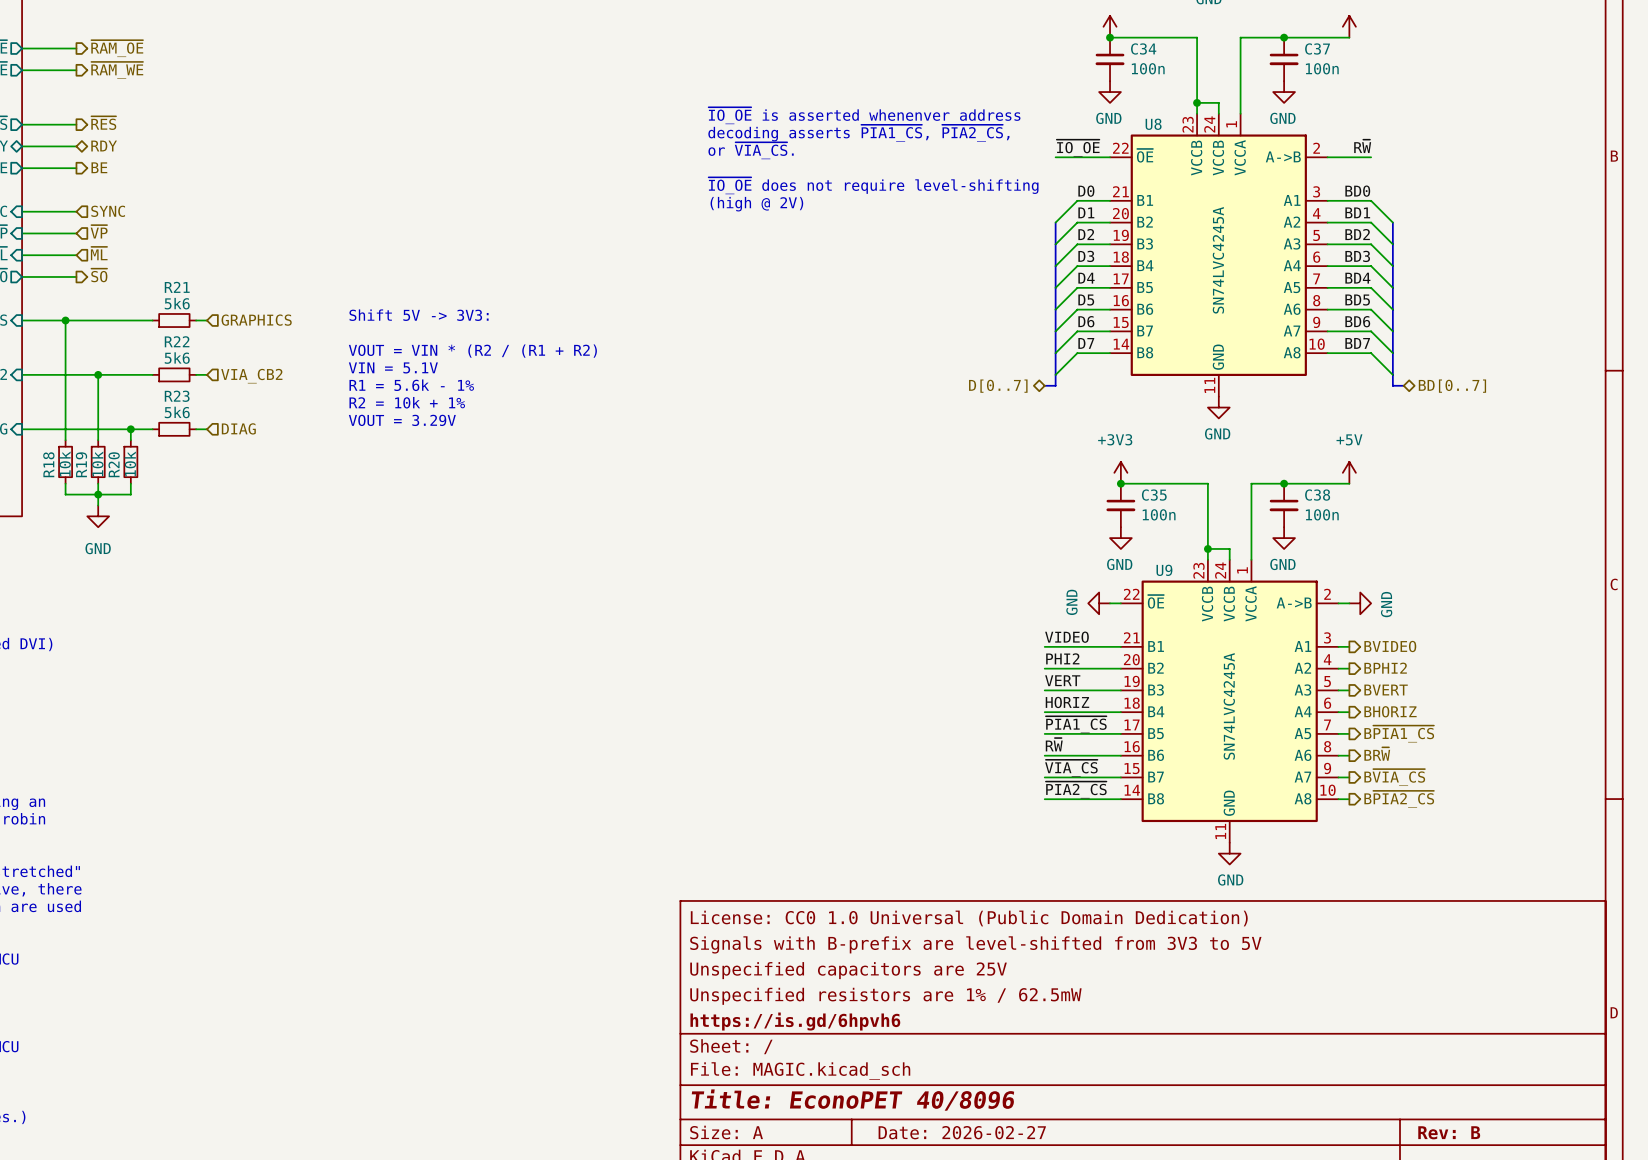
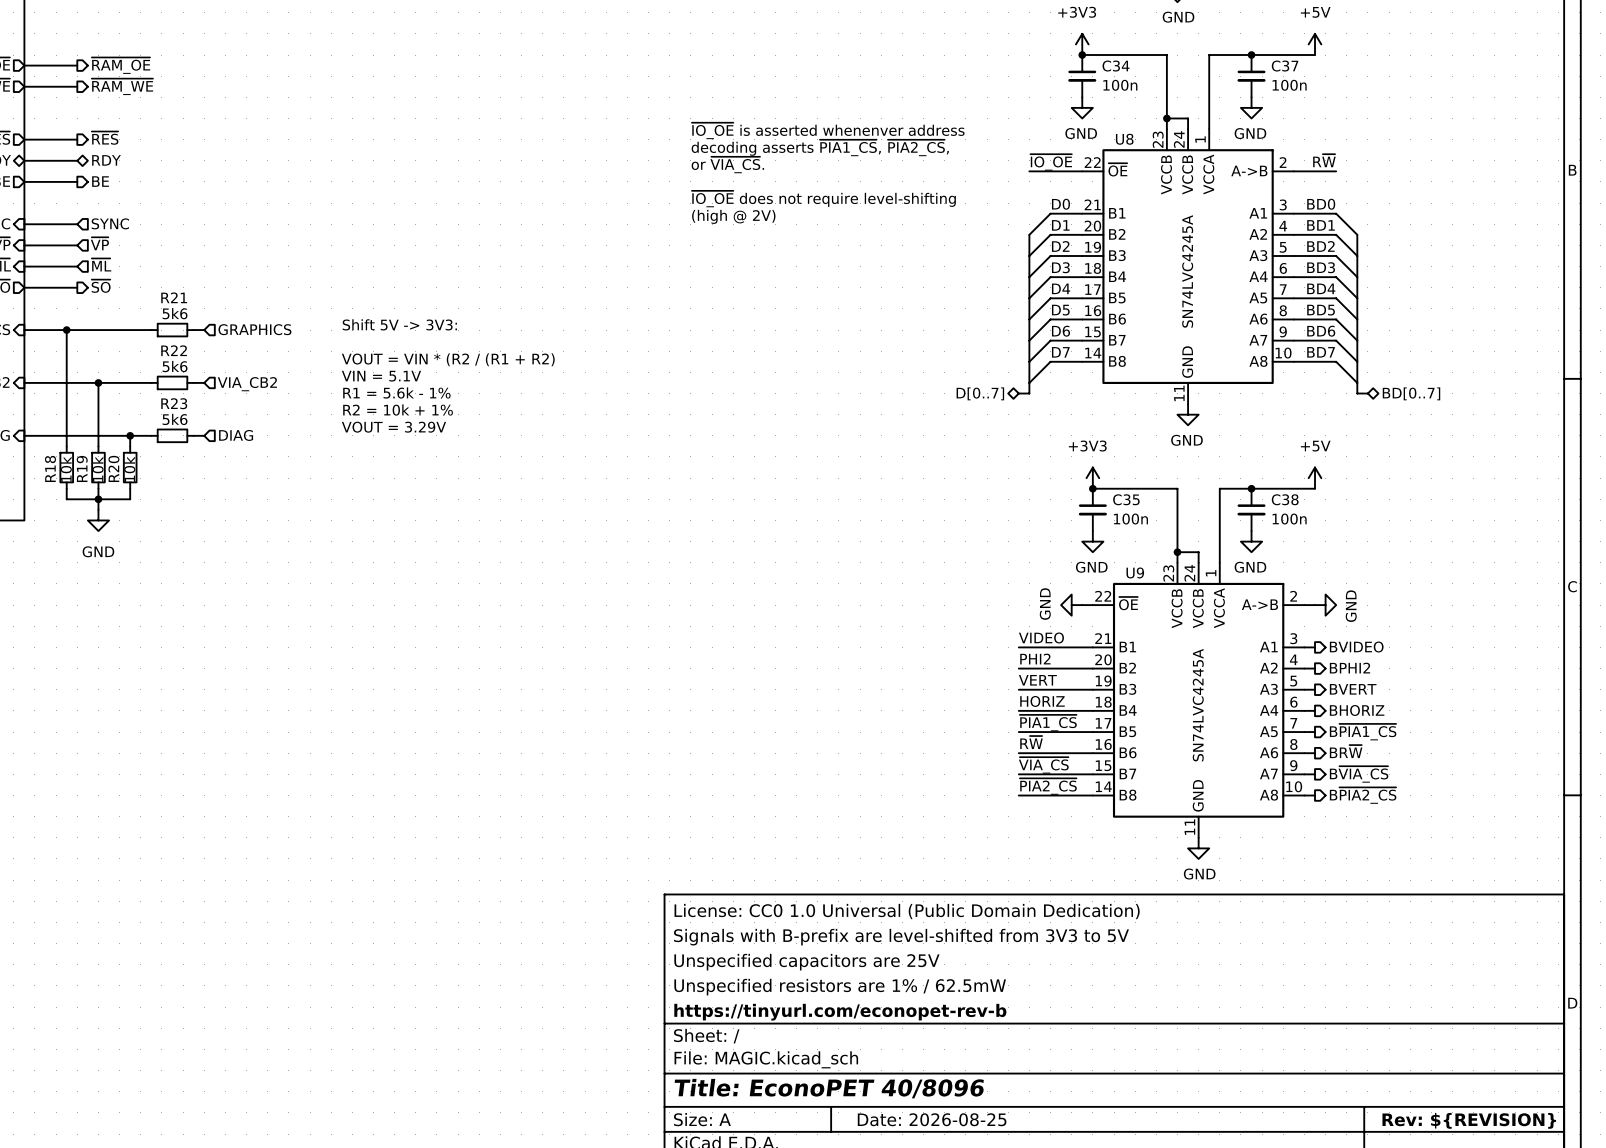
title block: https://is.gd/6hpvh6 (795, 1021) -> https://tinyurl.com/econopet-rev-b (840, 1012)
title block: Date: 2026-02-27 (962, 1132) -> Date: 2026-08-25 (932, 1119)
title block: Rev: B (1449, 1132) -> Rev: ${REVISION} (1469, 1120)

